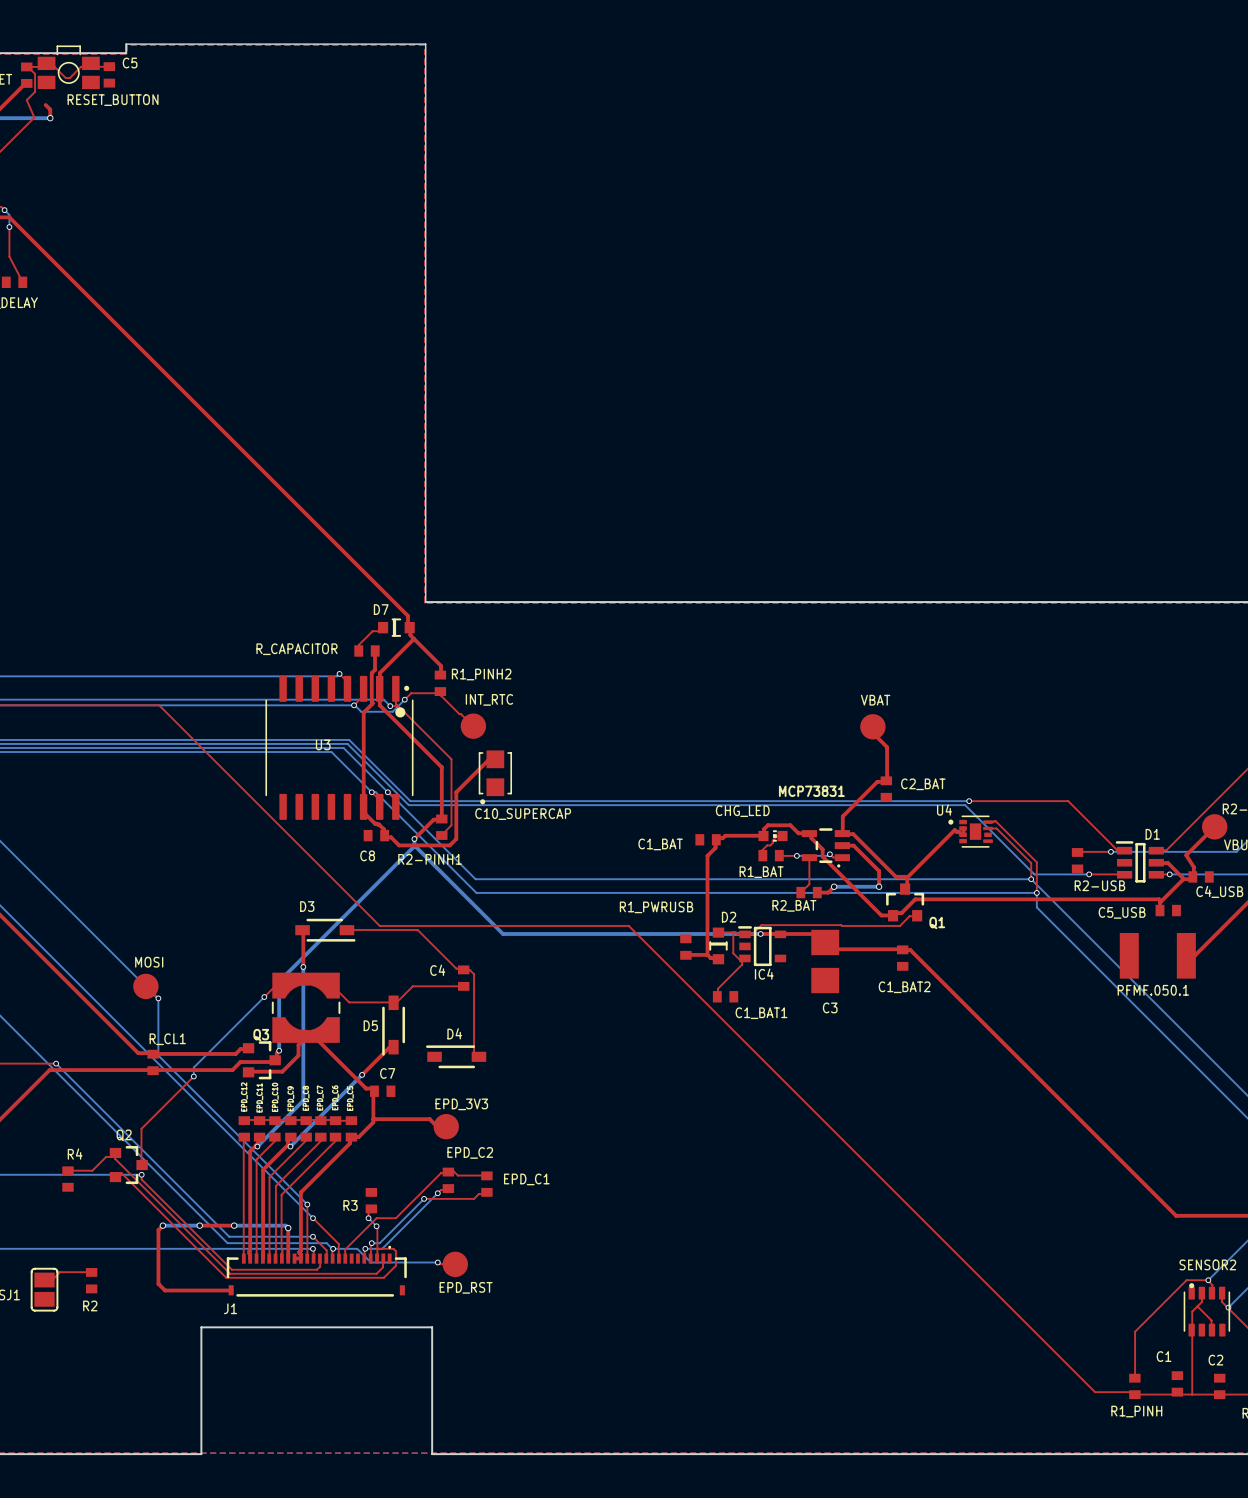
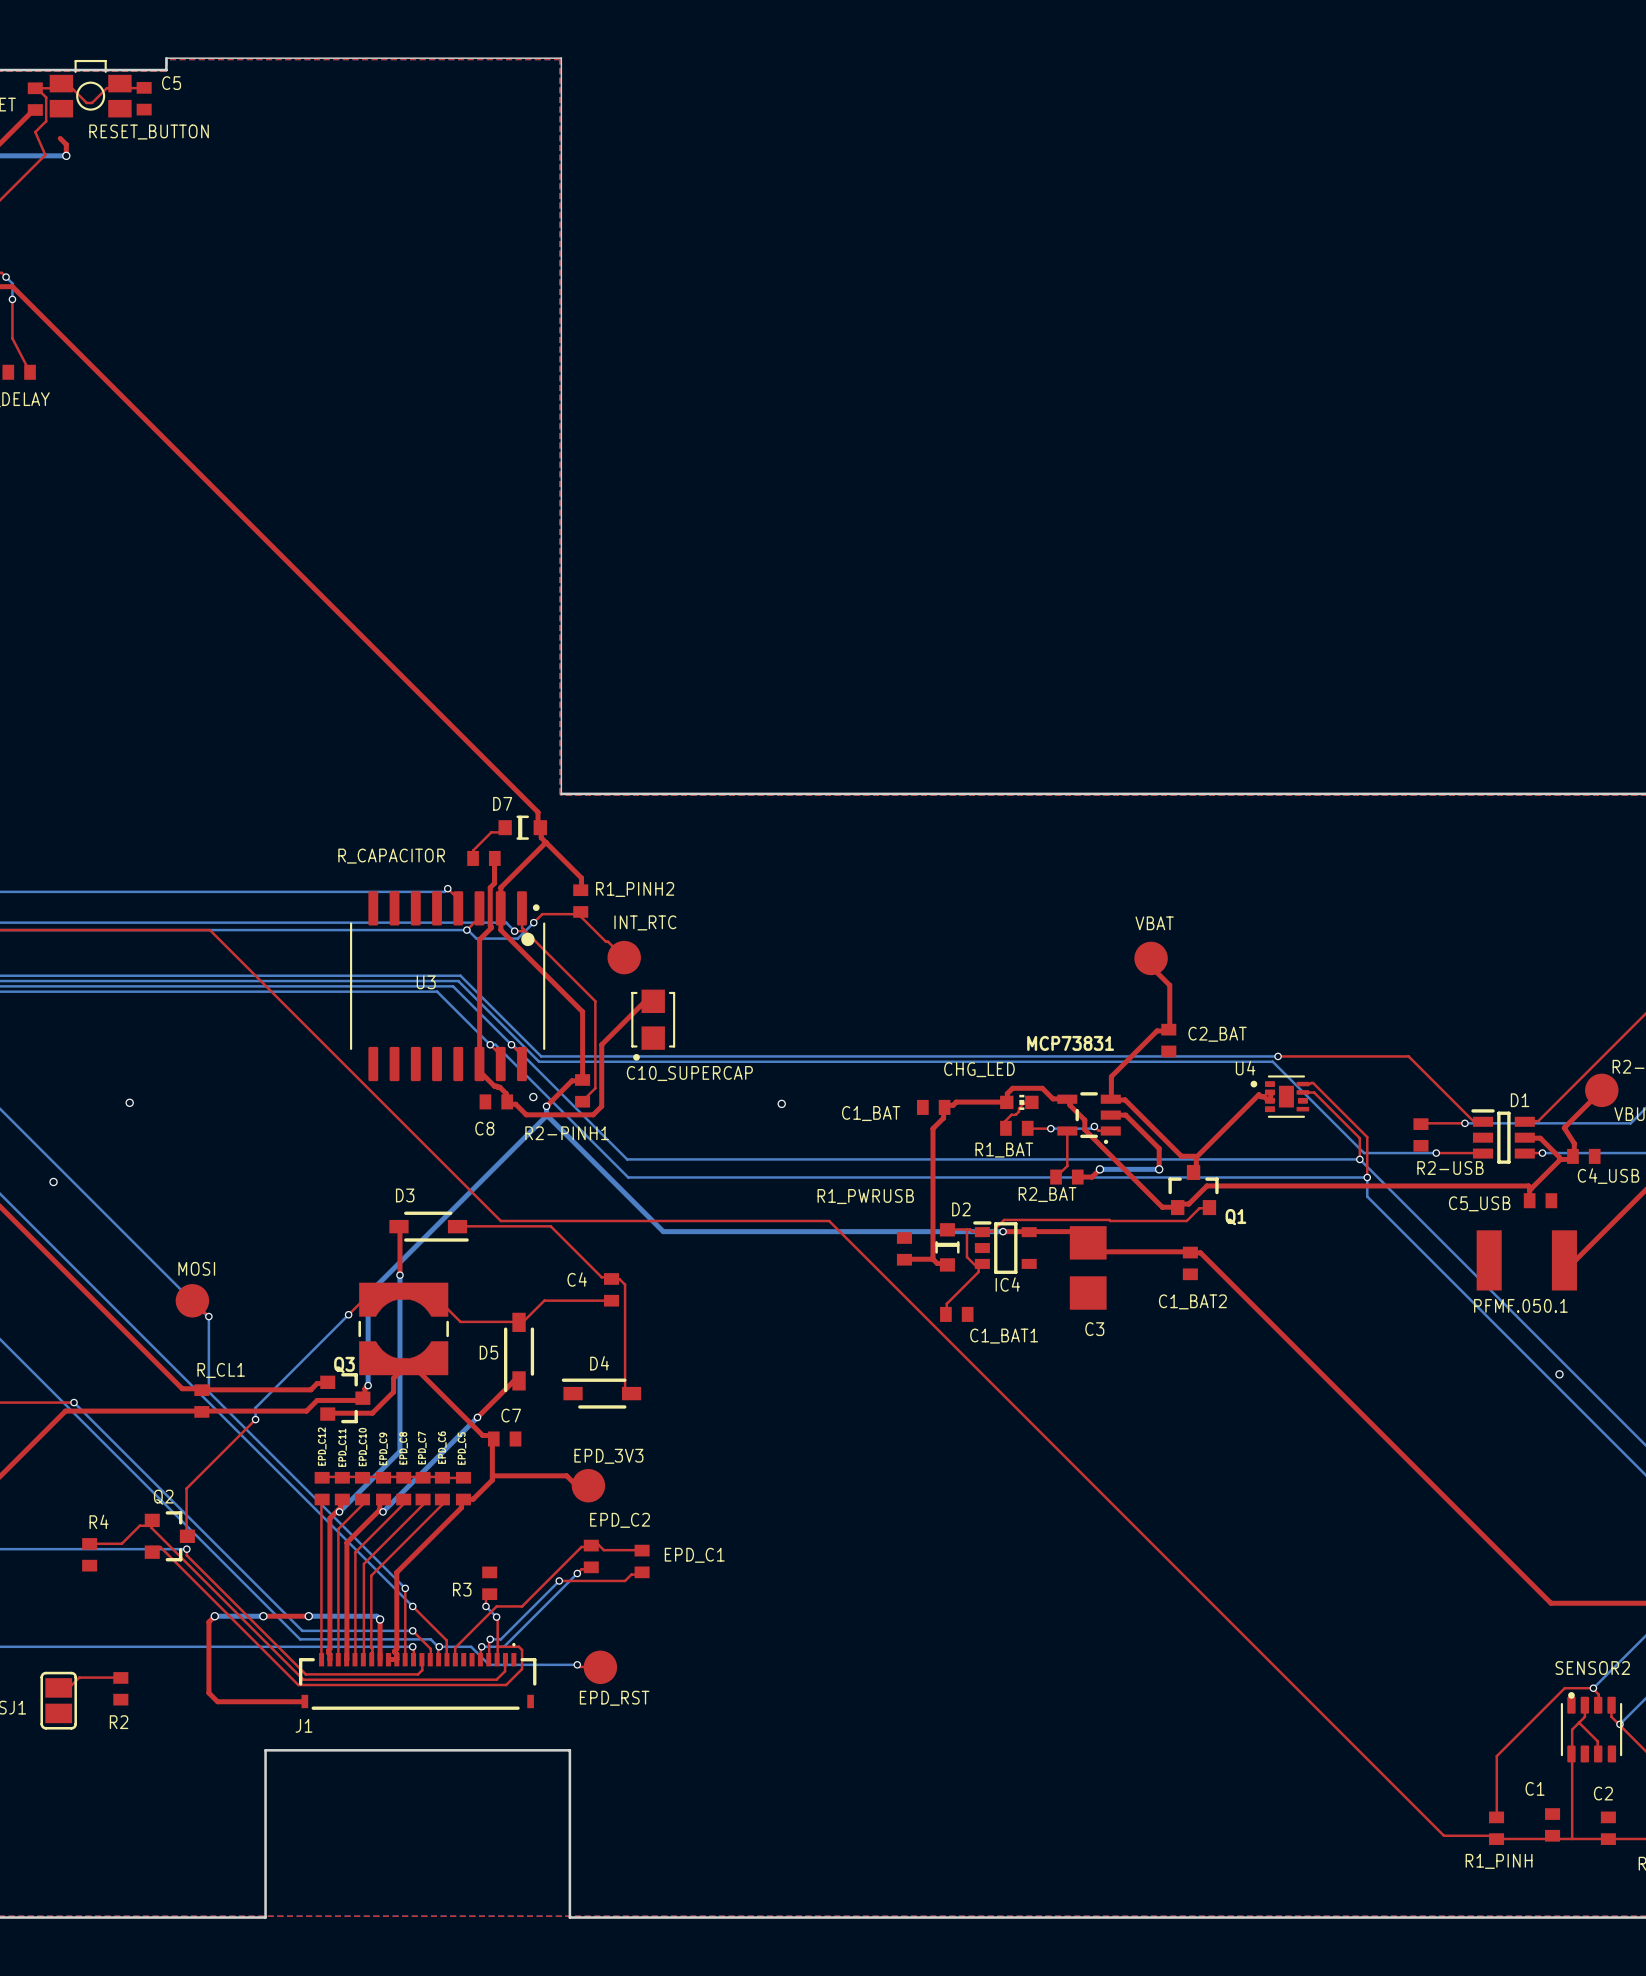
via: none -> (533, 1097)
via: none -> (129, 1102)
via: none -> (781, 1103)
via: none -> (53, 1181)
via: none -> (1559, 1374)

